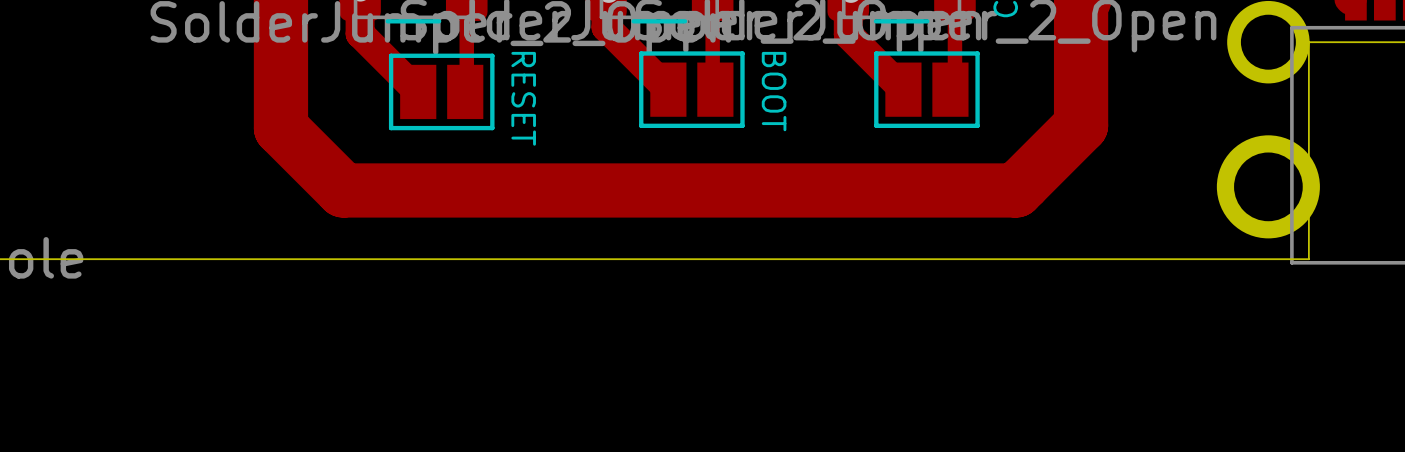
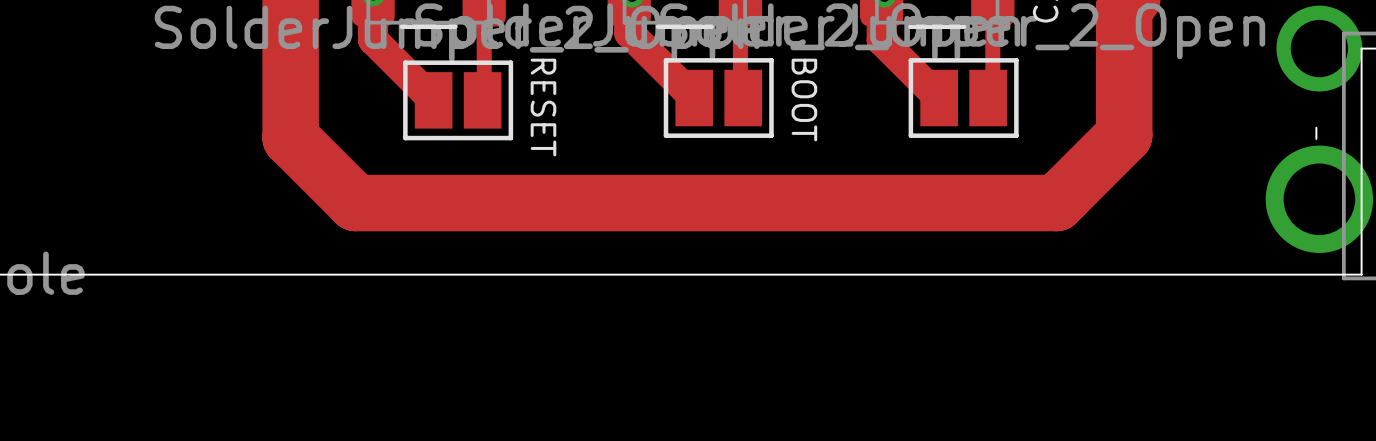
board edge: none -> (1316, 127) (1316, 138)

